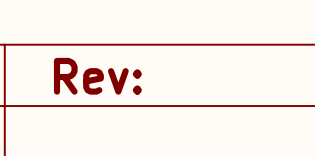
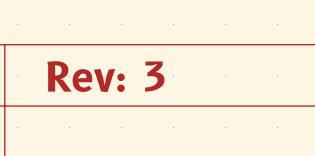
title block: Rev: (97, 76) -> Rev: 3 (105, 76)

